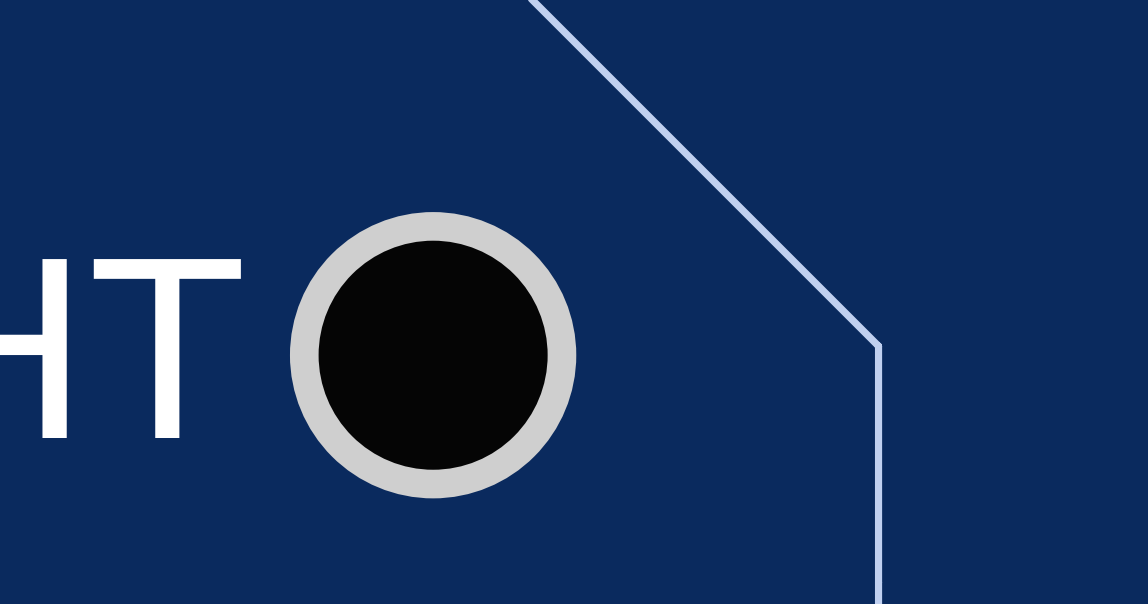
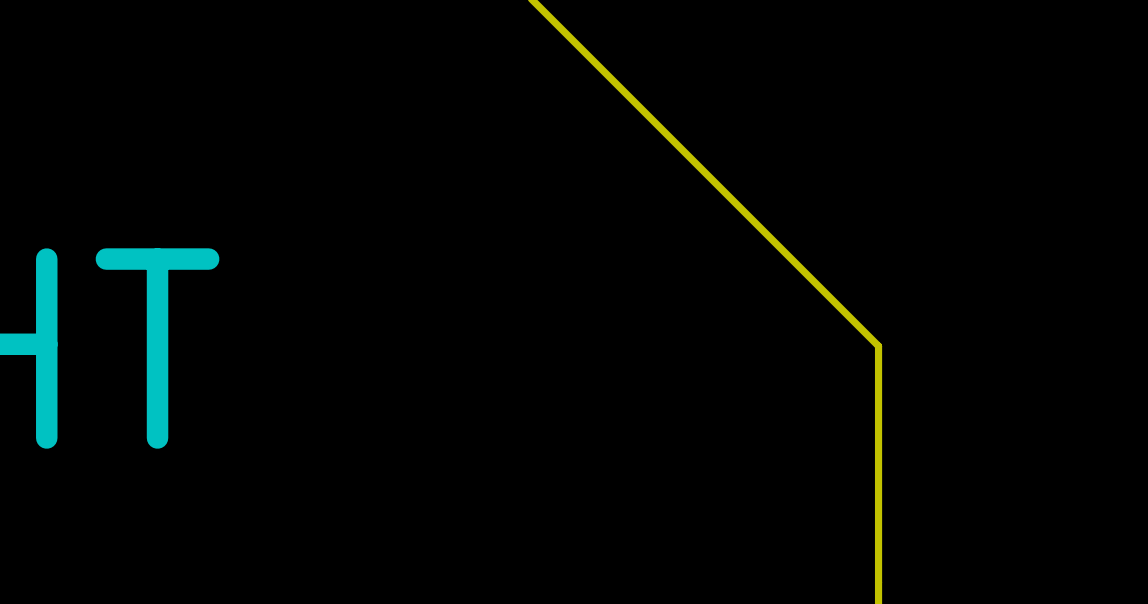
part: (433, 355) -> none

